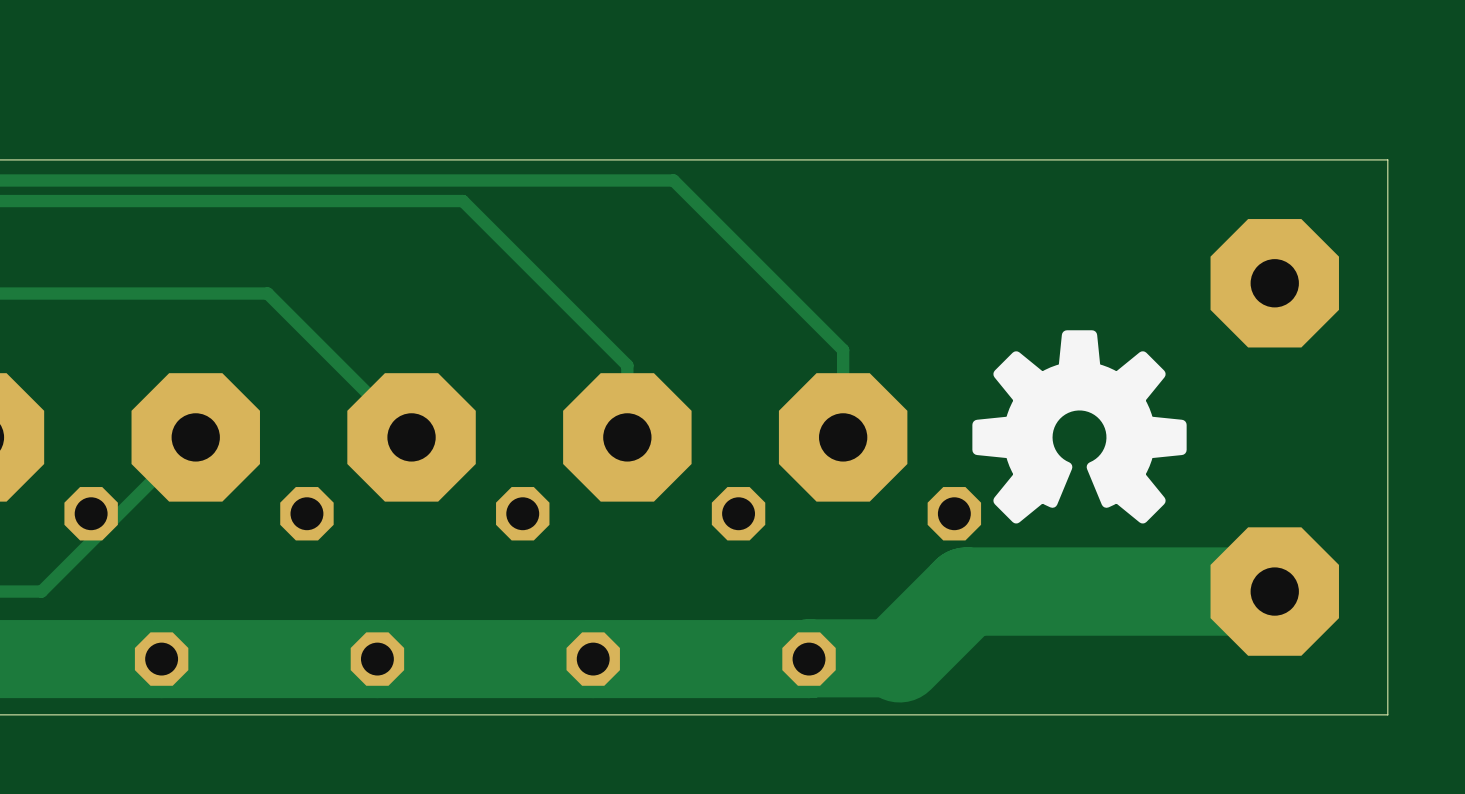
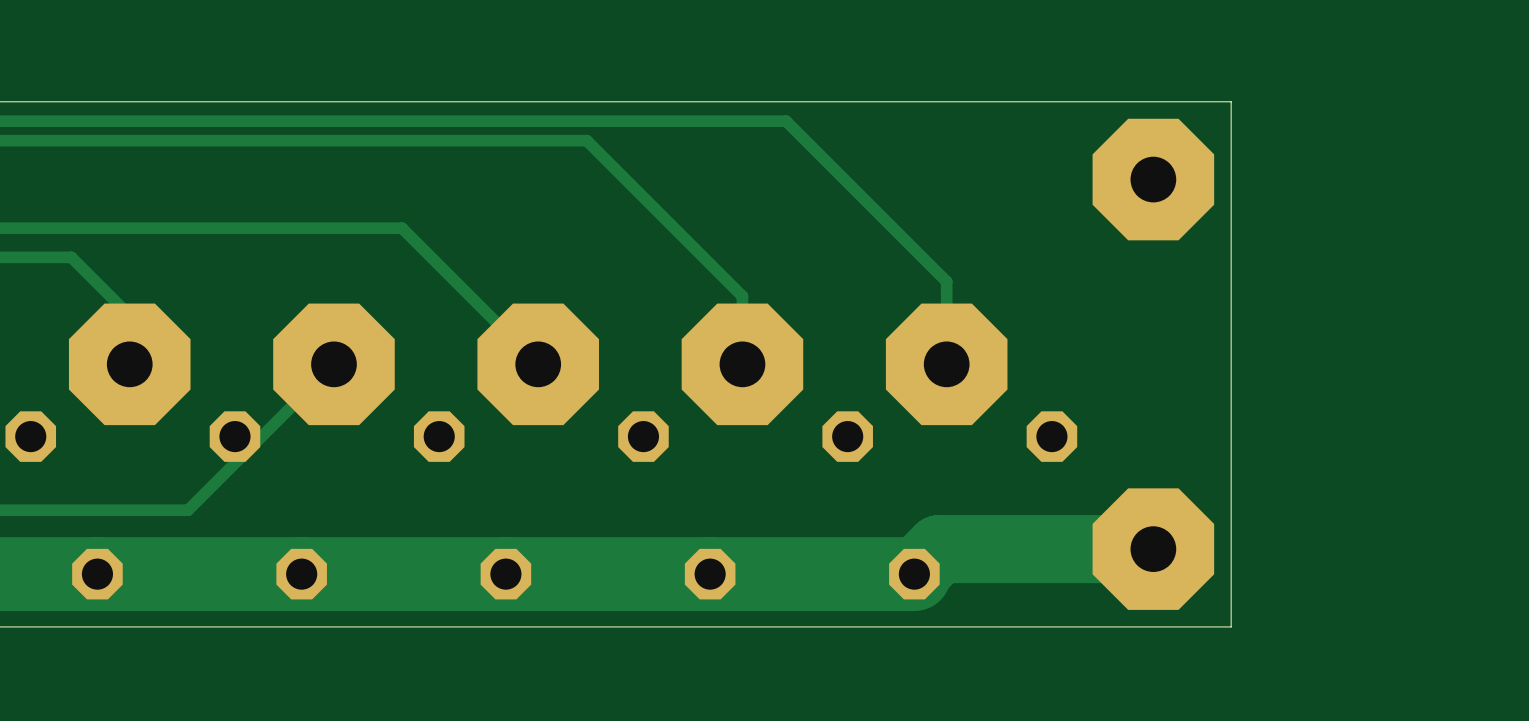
board edge: (1143, 159) (1387, 159) (1387, 714) (1143, 714) -> (1231, 101) (1231, 626)
part: none -> (1153, 179)
part: (1274, 283) -> none
drawing: [972, 330, 1187, 524] -> none
track: (1274, 591) (966, 591) (899, 658) (809, 658) -> (1153, 549) (939, 549) (914, 574)
part: (1274, 591) -> none
part: none -> (1153, 549)

